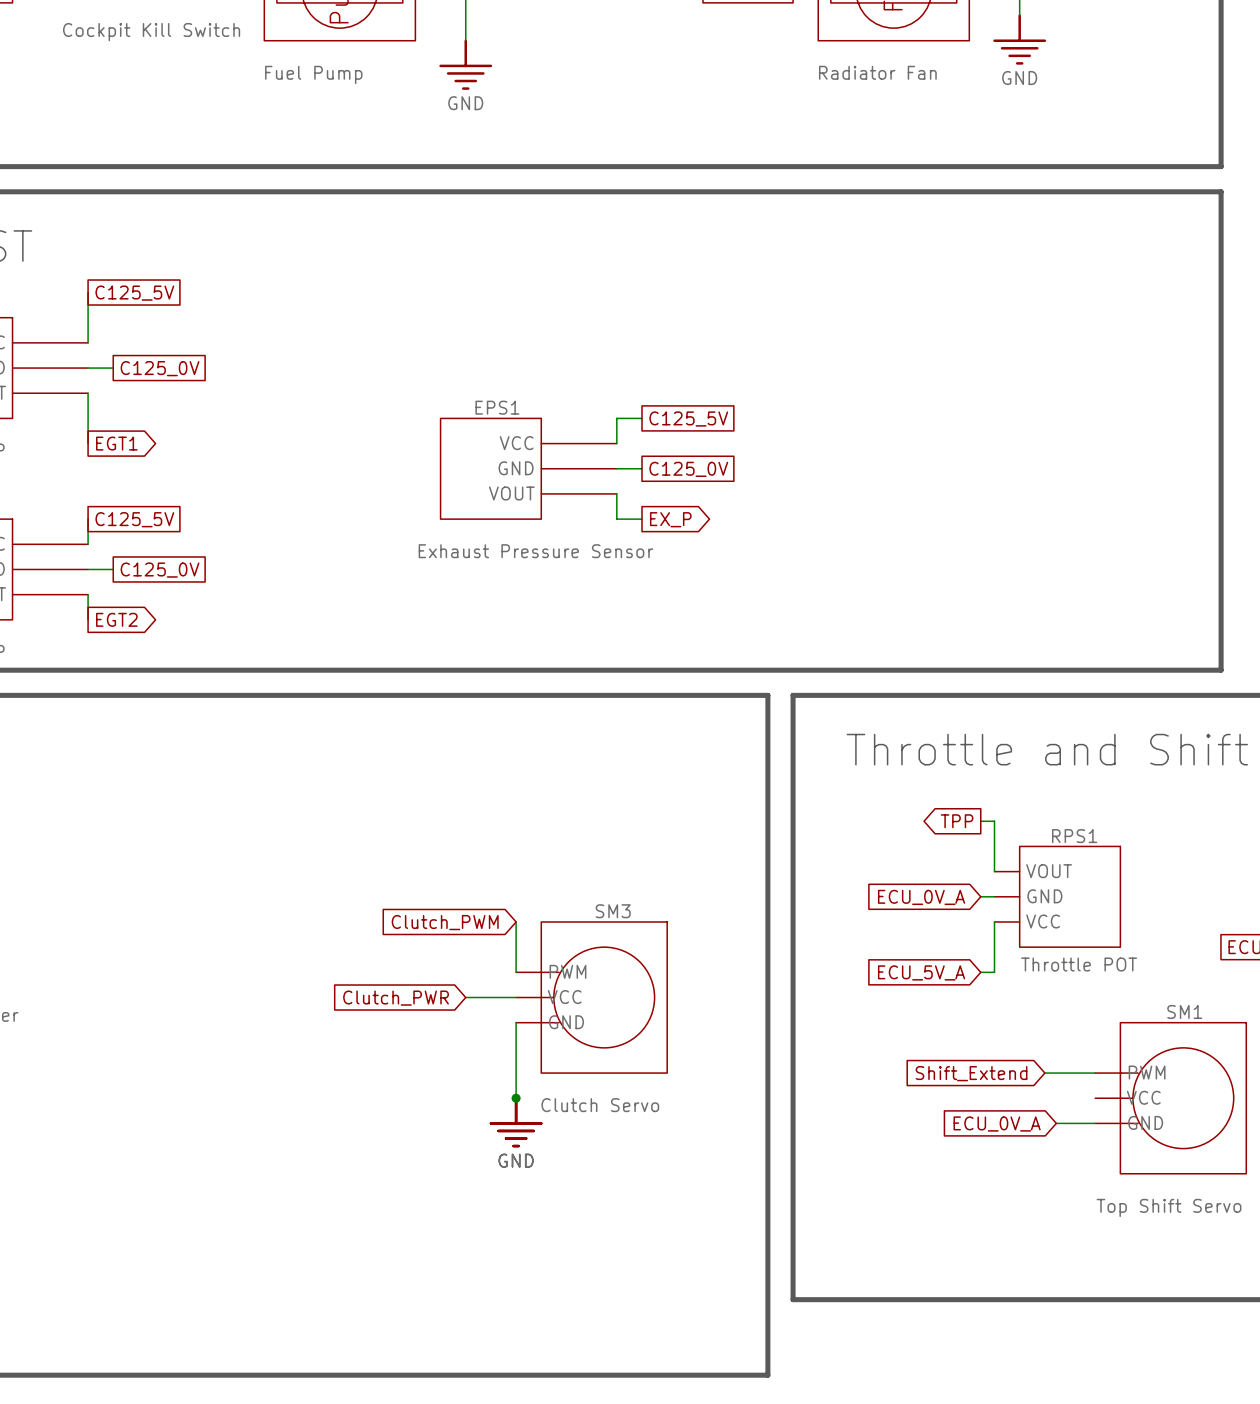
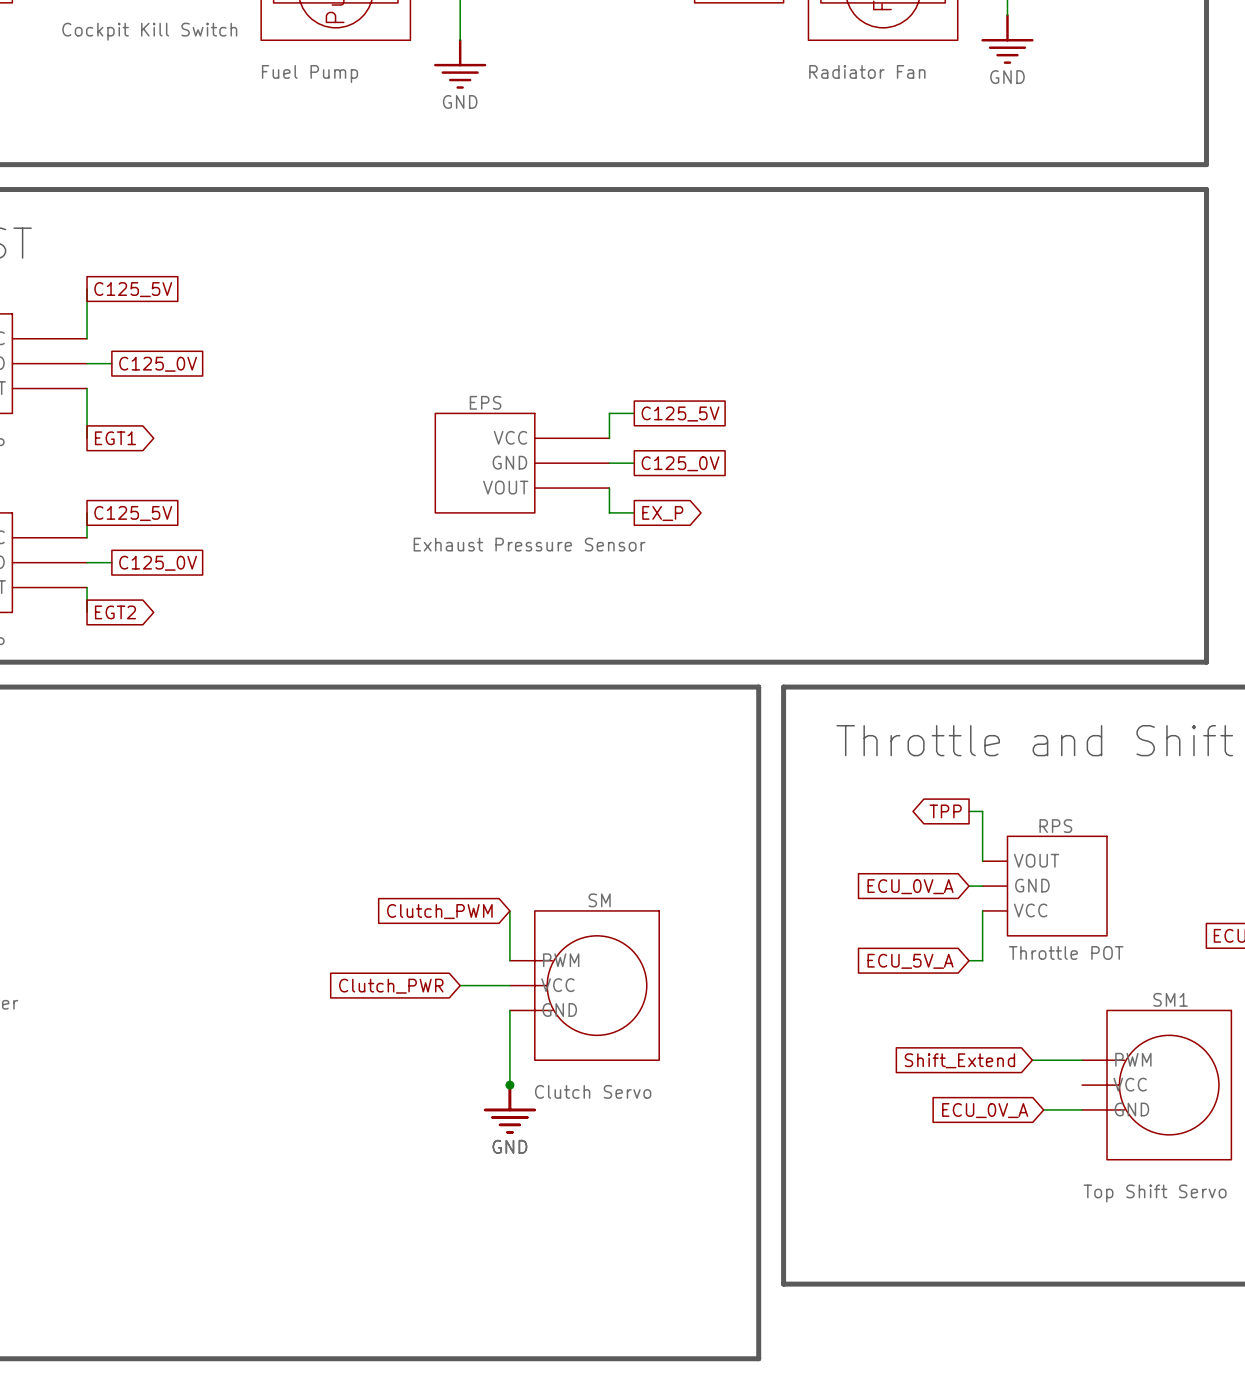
EPS1 name: EPS1 (497, 407) -> EPS (485, 402)
RPS1 name: RPS1 (1074, 836) -> RPS (1055, 826)
SM3 name: SM3 (613, 911) -> SM (599, 900)

